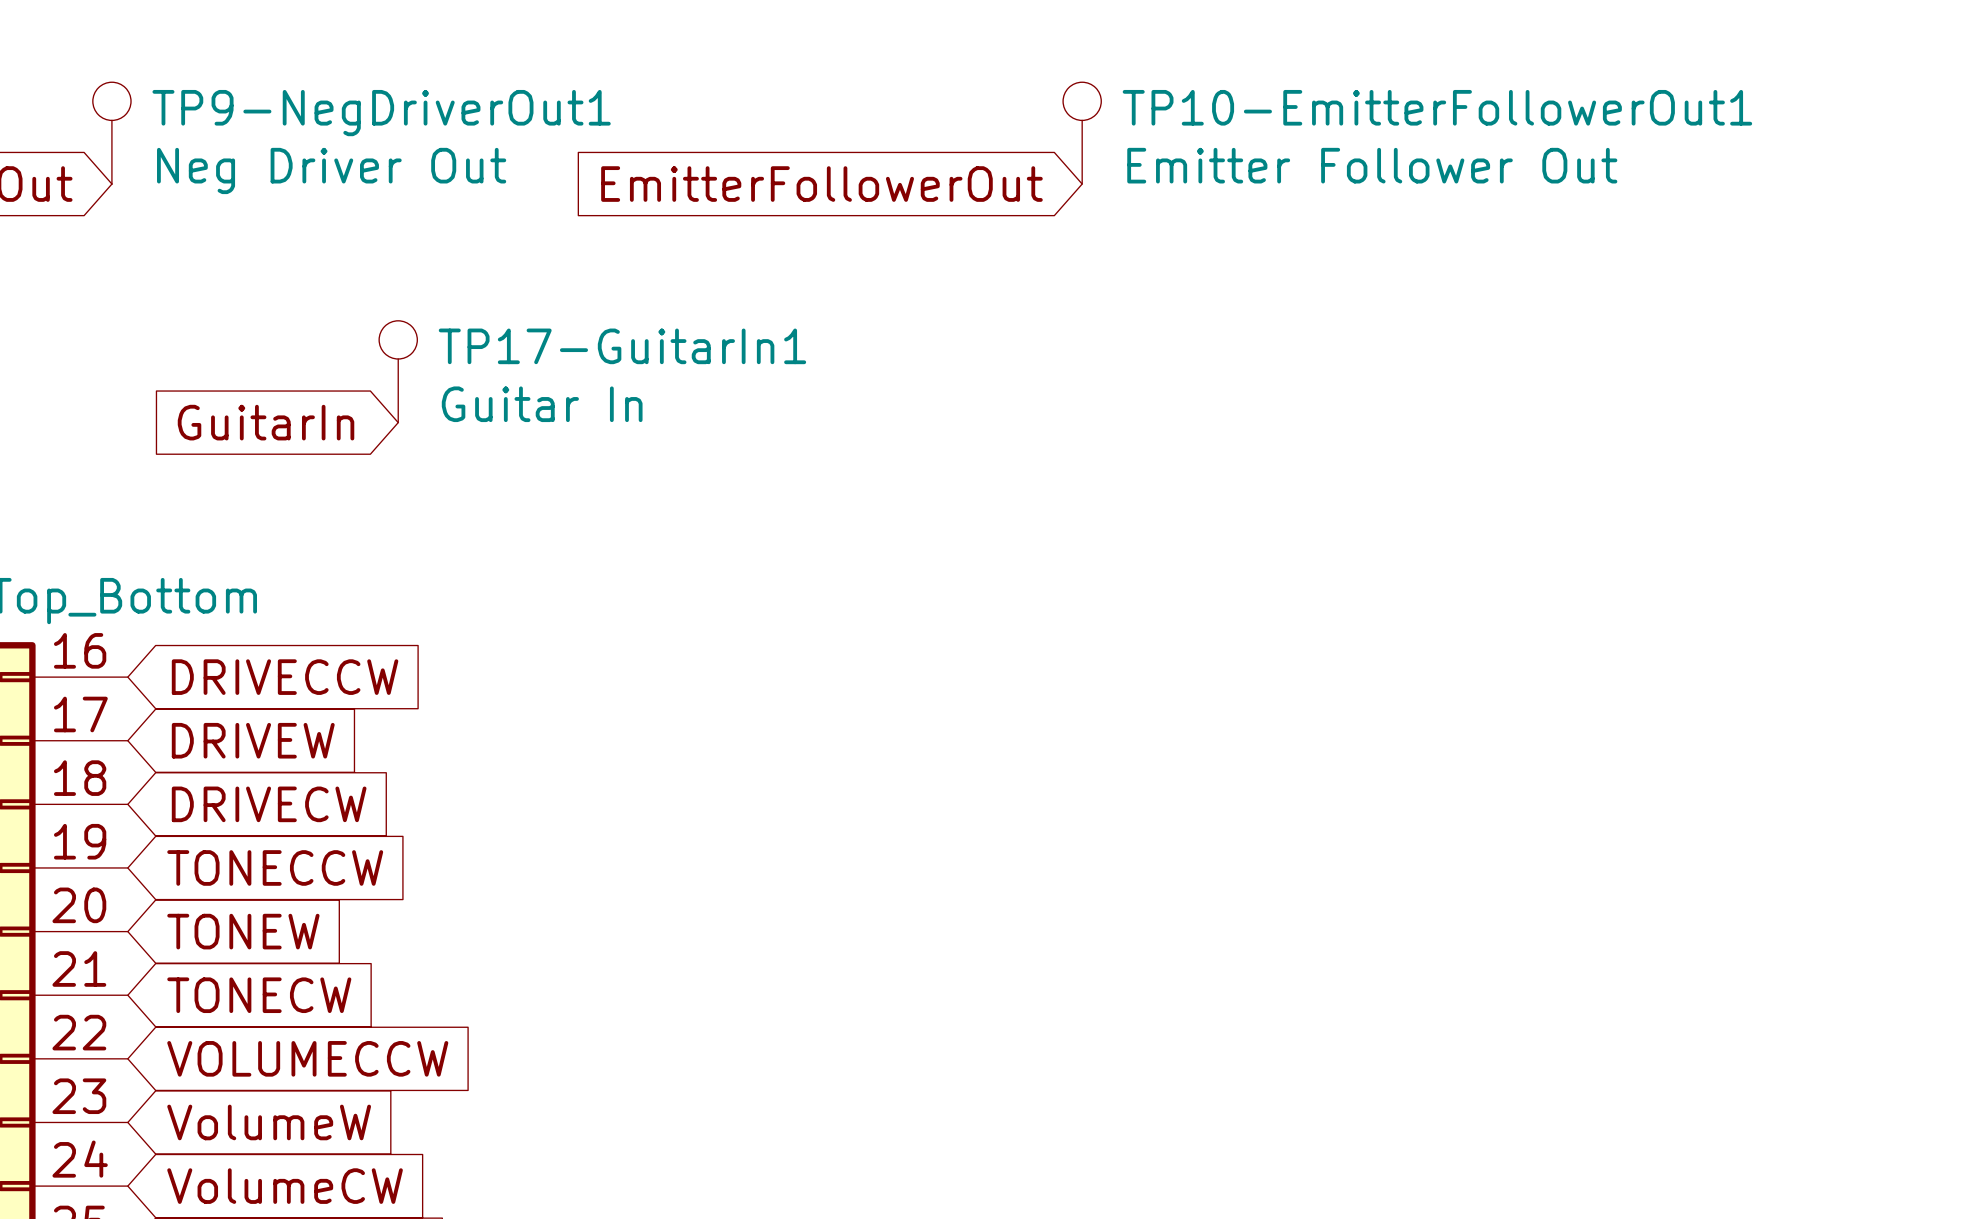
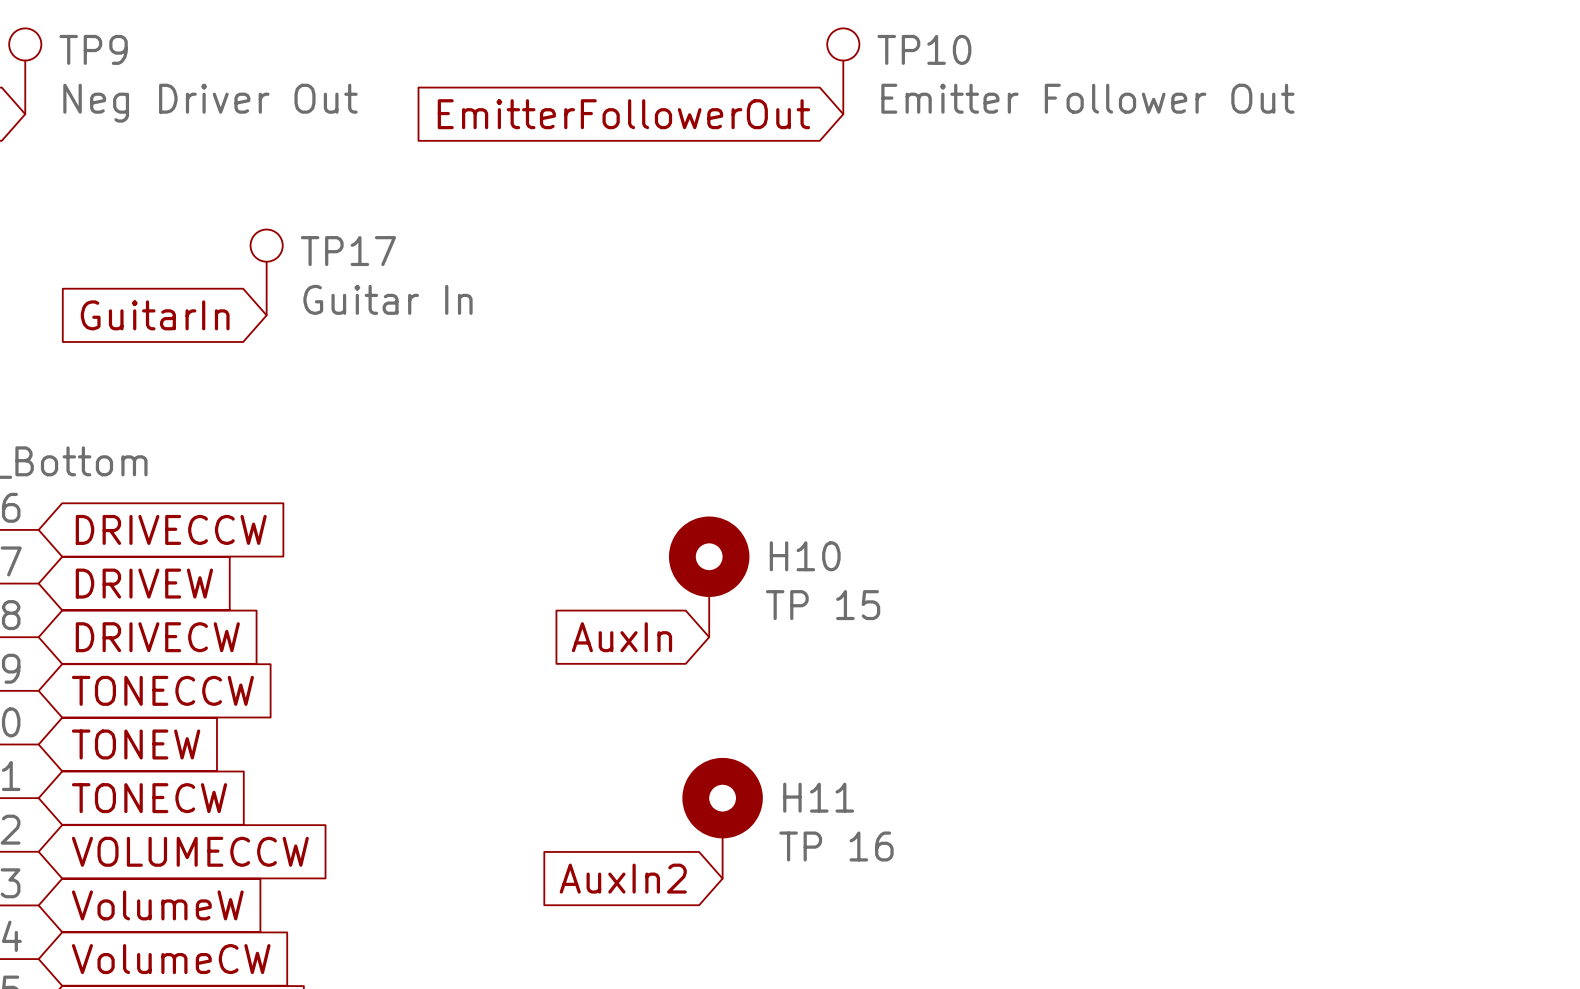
TP10-EmitterFollowerOut1 name: TP10-EmitterFollowerOut1 (1437, 107) -> TP10 (924, 49)
TP9-NegDriverOut1 name: TP9-NegDriverOut1 (381, 113) -> TP9 (93, 49)
TP17-GuitarIn1 name: TP17-GuitarIn1 (622, 346) -> TP17 (348, 251)
H10: none -> TP 15 (709, 576)
global label: none -> AuxIn (621, 637)
H11: none -> TP 16 (722, 818)
global label: none -> AuxIn2 (623, 878)

